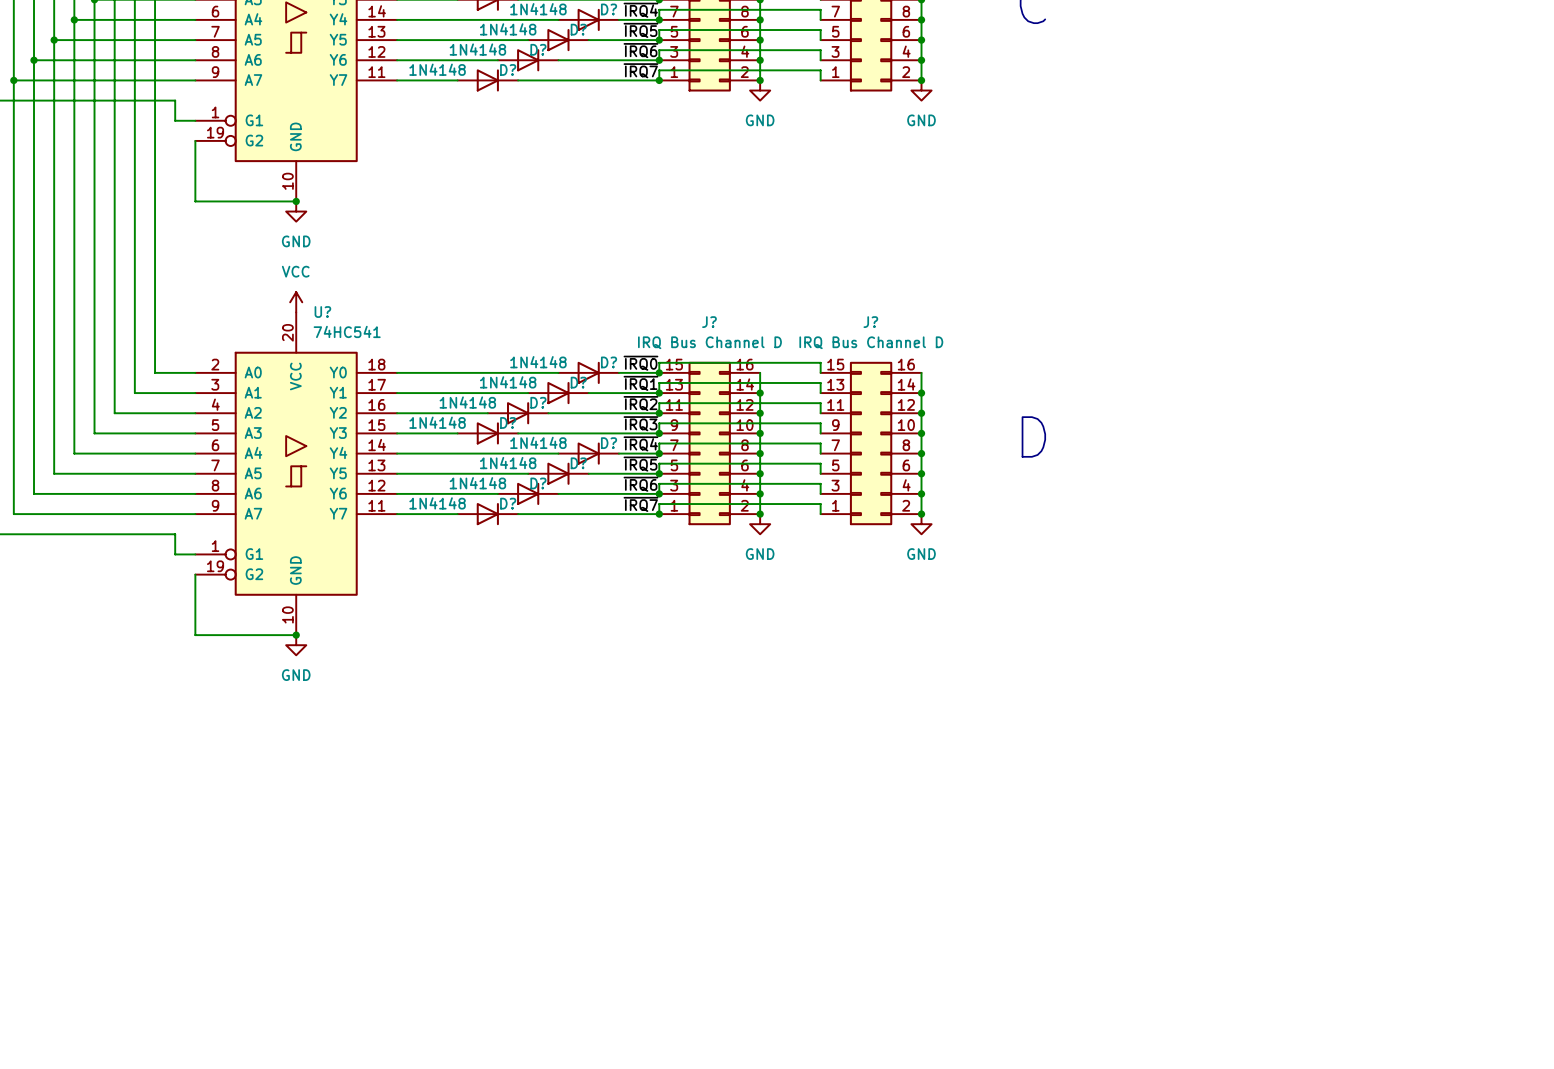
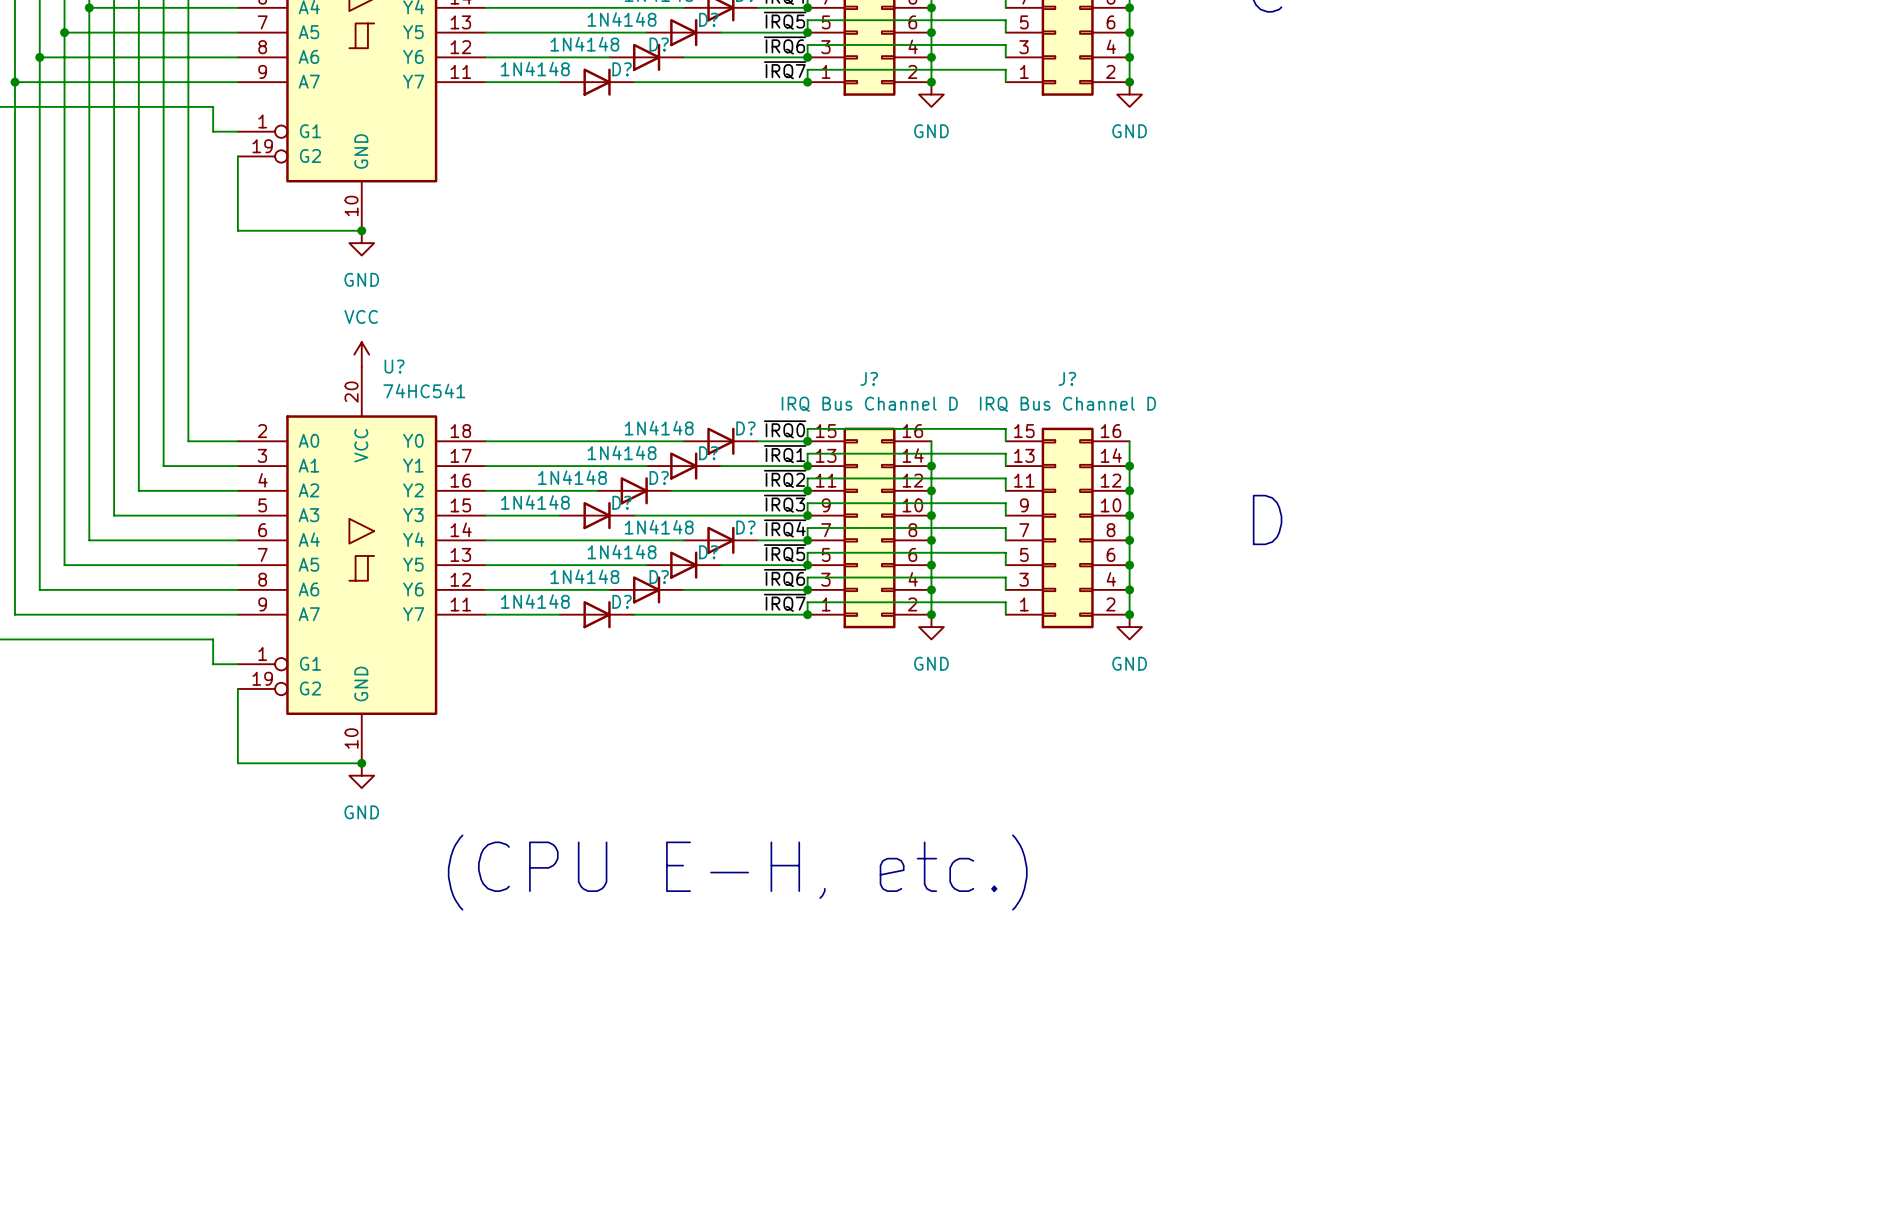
text: none -> (CPU E-H, etc.) (737, 872)

